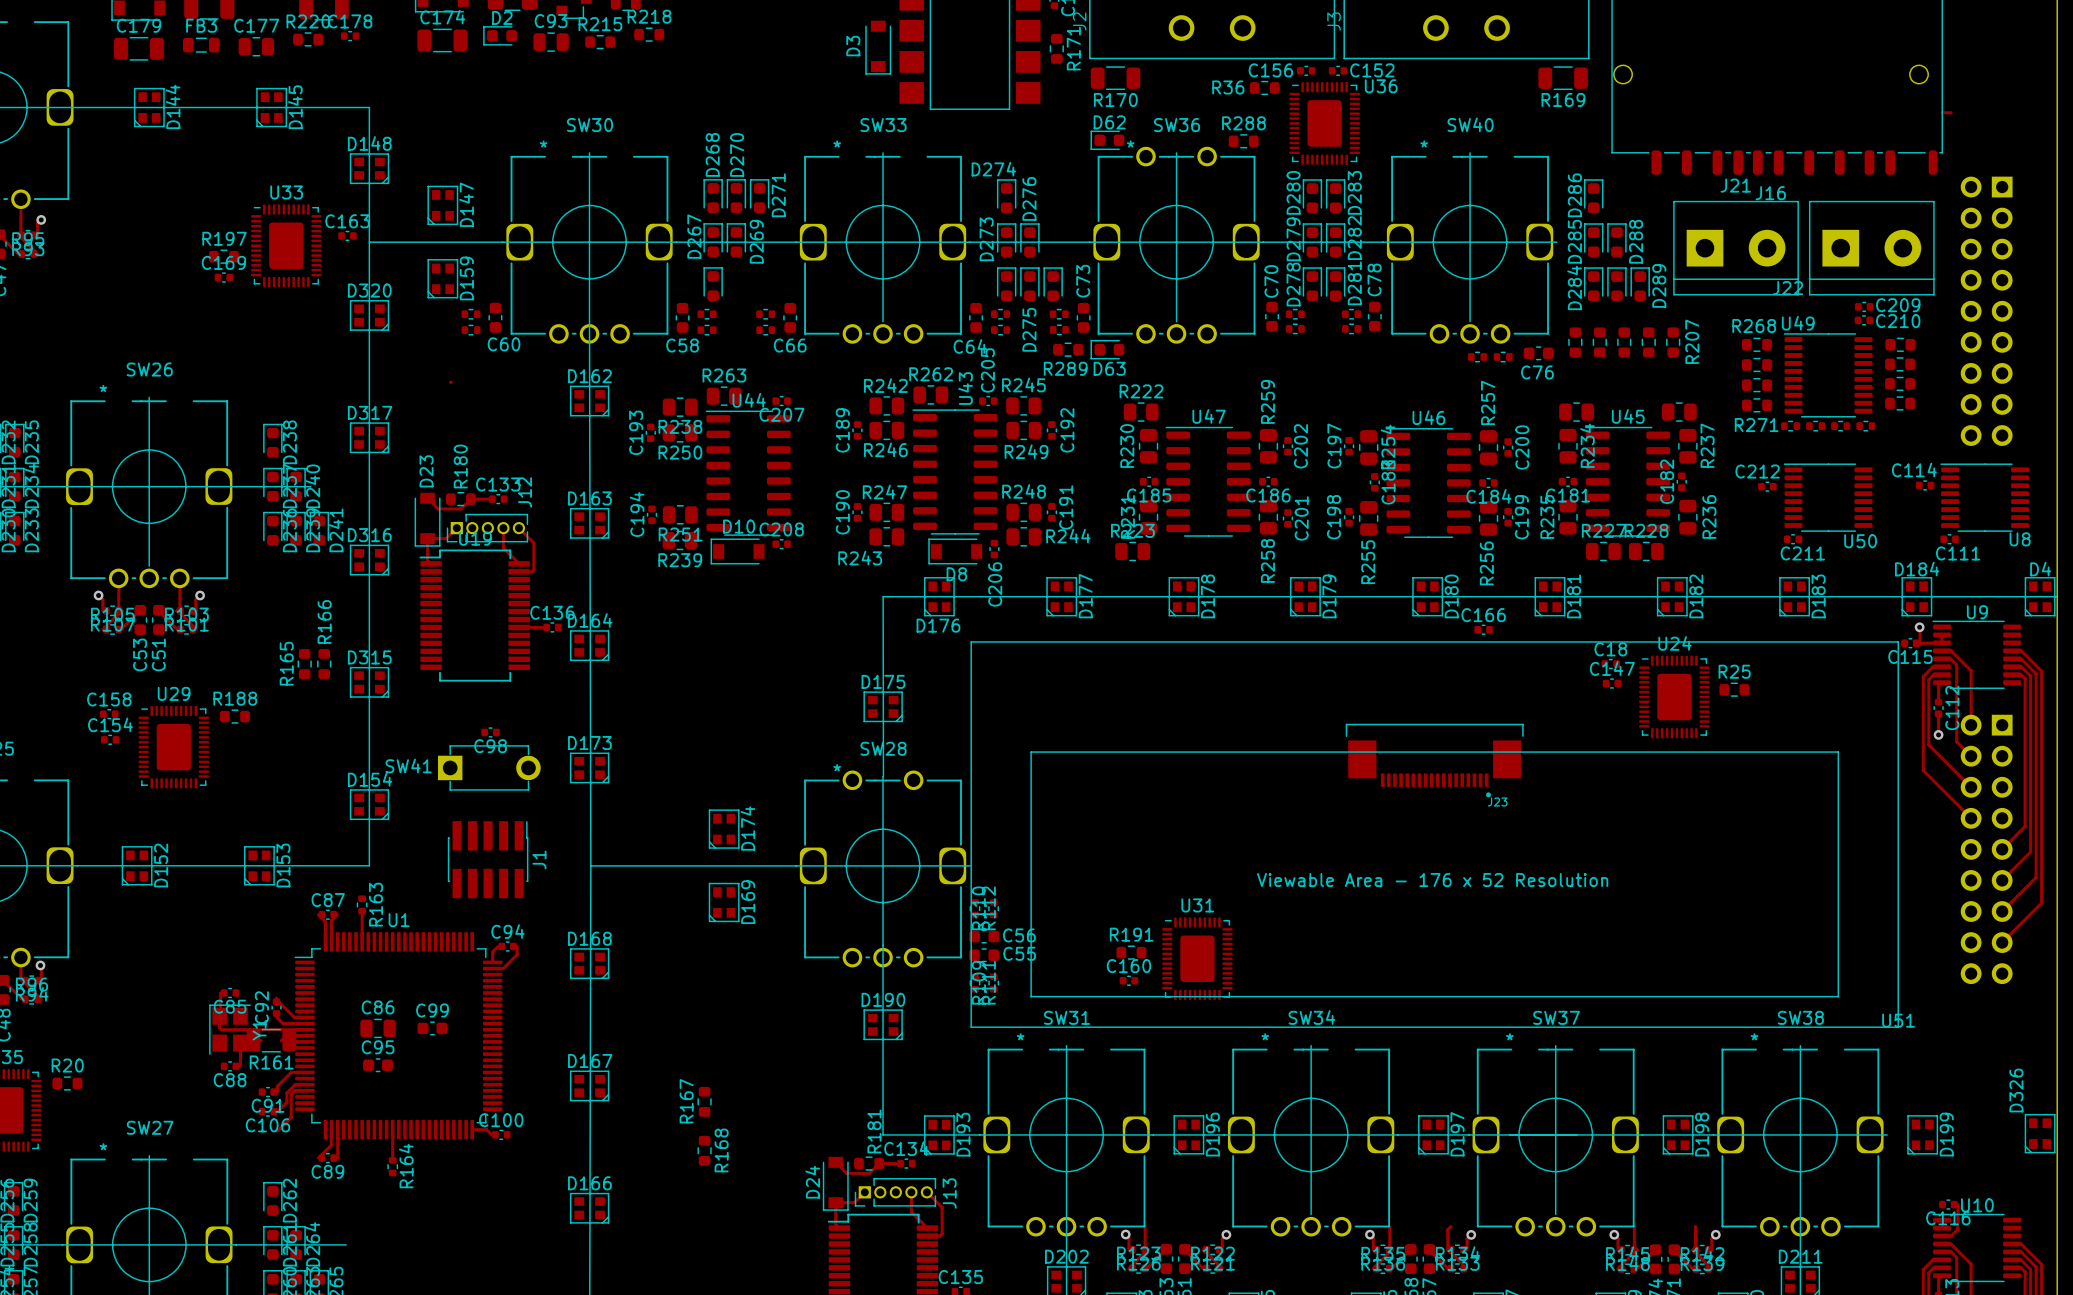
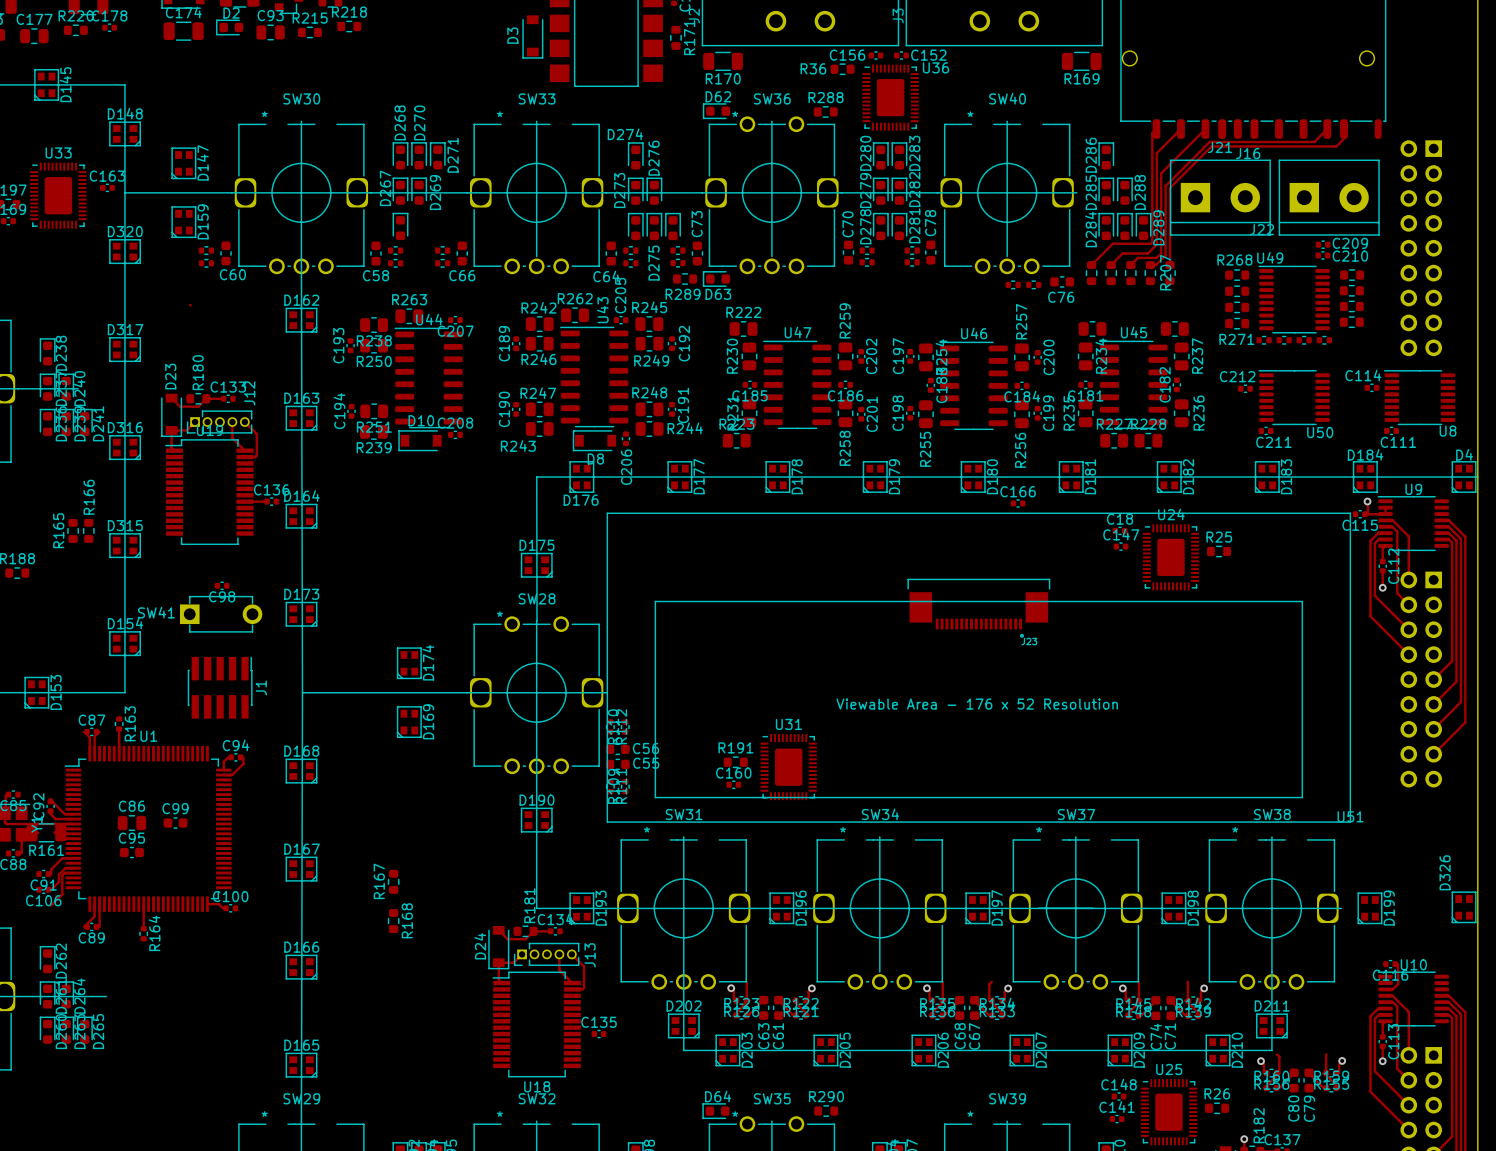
top track: (1942, 112) (1951, 112) -> none
top track: none -> (1156, 129) (1152, 133) (1152, 242) (1112, 243) (1091, 265)
top track: none -> (1180, 129) (1156, 153) (1156, 244) (1147, 253) (1122, 253) (1111, 265)
top track: none -> (1205, 129) (1161, 173) (1161, 253) (1156, 257) (1137, 257) (1130, 265)
top track: none -> (1327, 129) (1314, 142) (1209, 142) (1165, 186) (1165, 255) (1155, 265) (1150, 265)
top track: none -> (1343, 129) (1343, 138) (1336, 146) (1211, 146) (1170, 187) (1170, 265)
R207 name: none -> R207 (1165, 272)
R207 name: R207 (1692, 341) -> none

